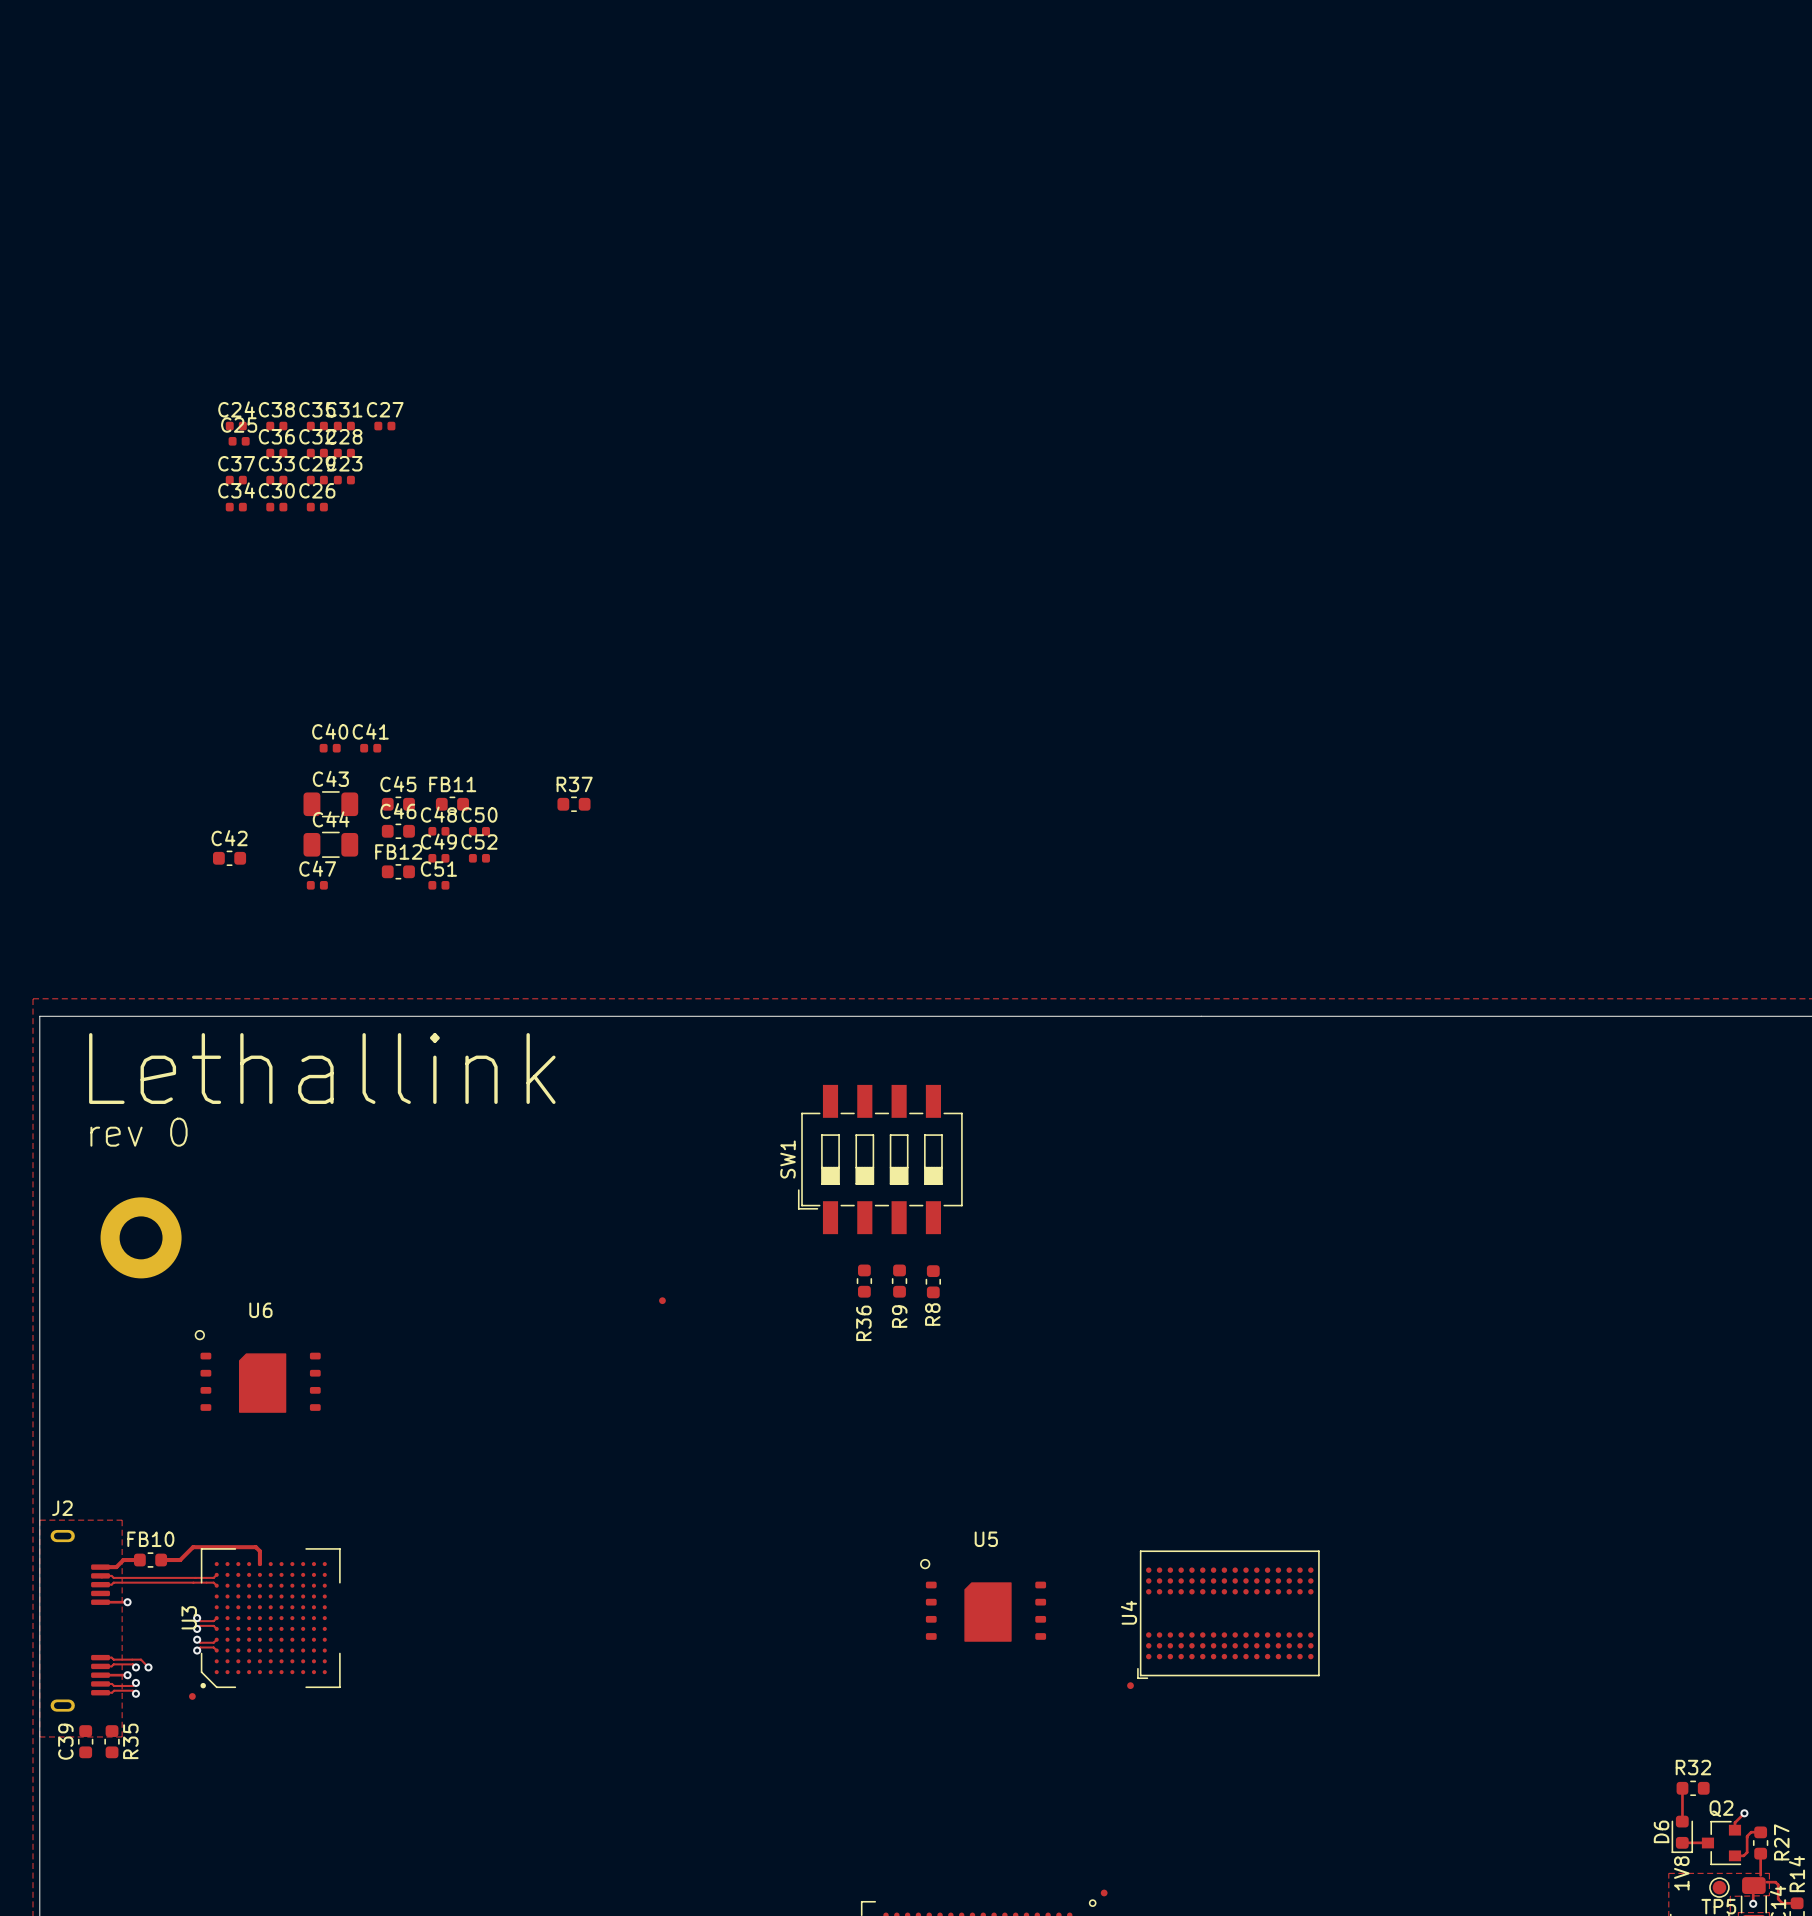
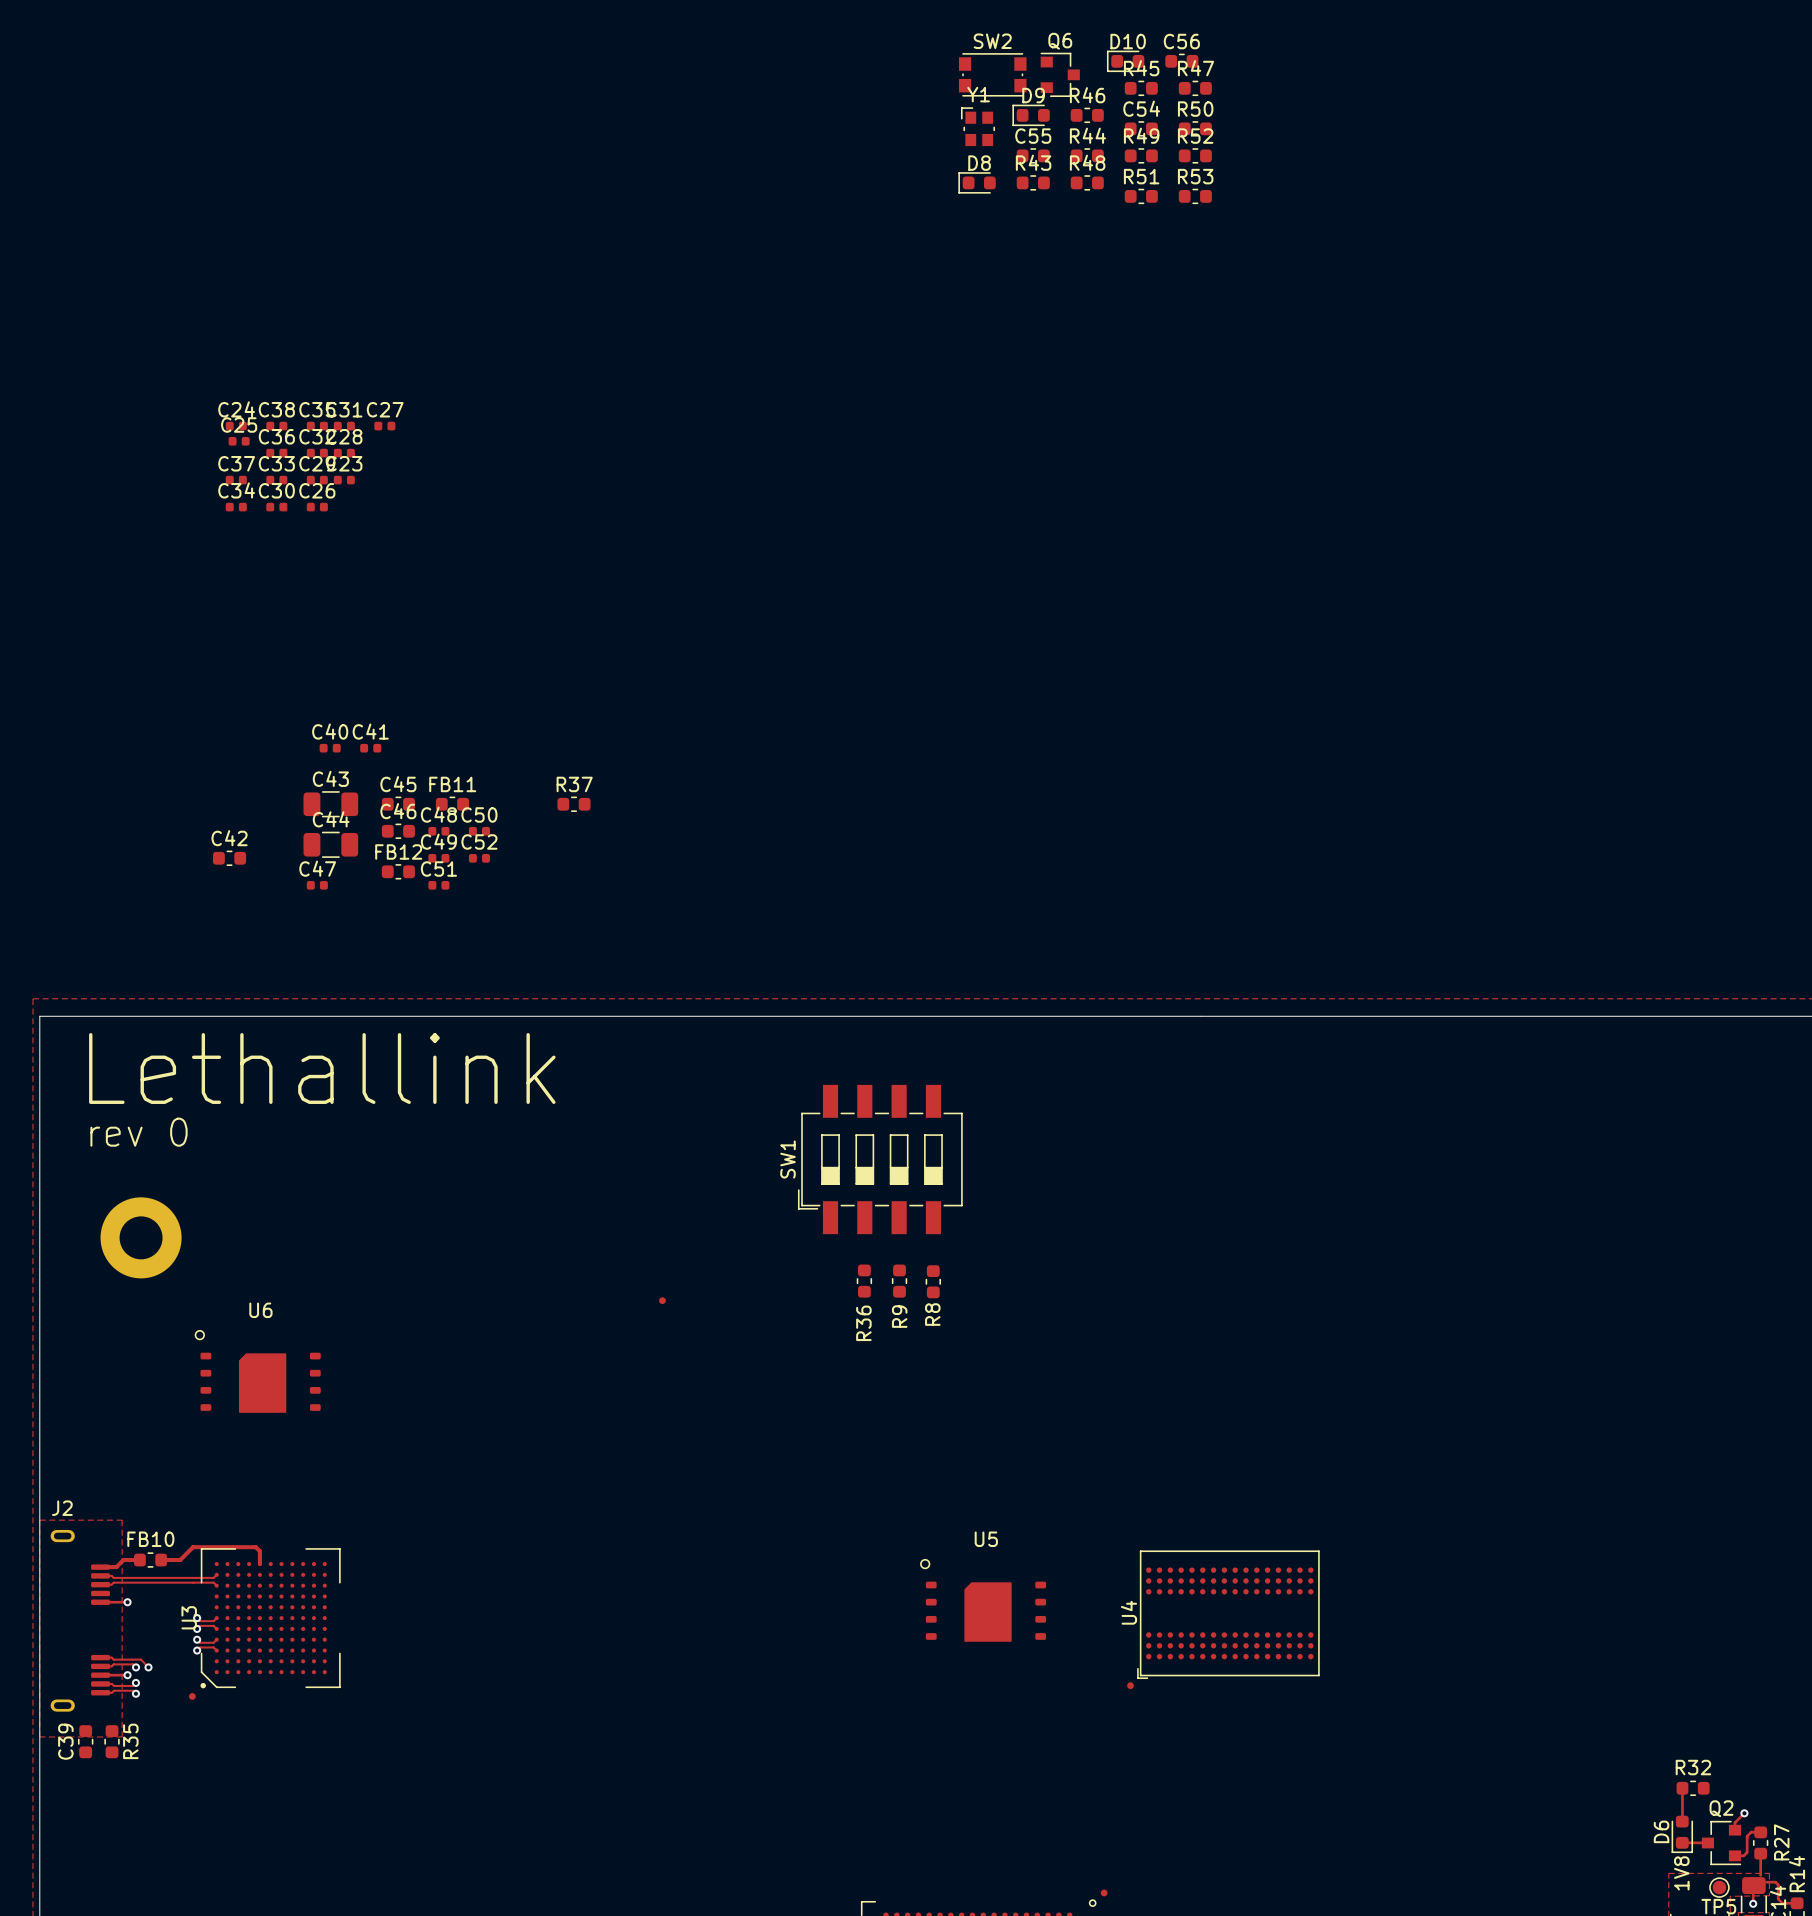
D10: none -> (1125, 61)
C56: none -> (1181, 61)
SW2: none -> (992, 74)
Q6: none -> (1060, 74)
R45: none -> (1141, 88)
R47: none -> (1195, 88)
D9: none -> (1031, 115)
R46: none -> (1087, 115)
Y1: none -> (978, 126)
C54: none -> (1141, 128)
R50: none -> (1195, 128)
C55: none -> (1033, 155)
R44: none -> (1087, 155)
R49: none -> (1141, 155)
R52: none -> (1195, 155)
D8: none -> (977, 182)
R43: none -> (1033, 182)
R48: none -> (1087, 182)
R51: none -> (1141, 196)
R53: none -> (1195, 196)

